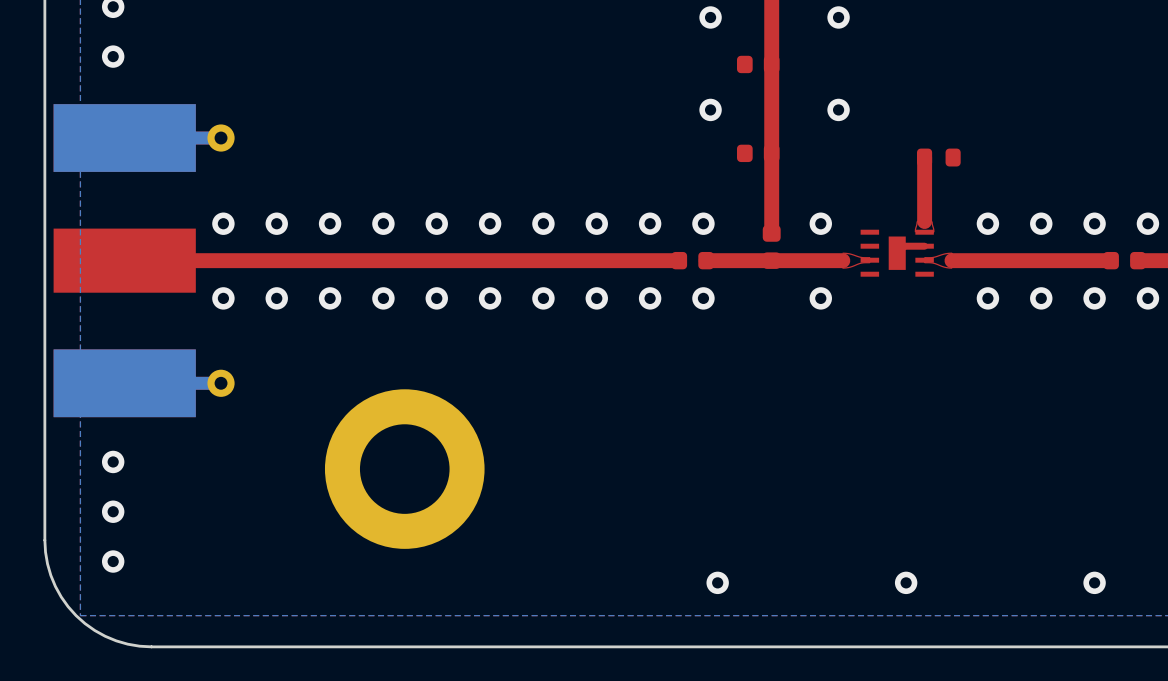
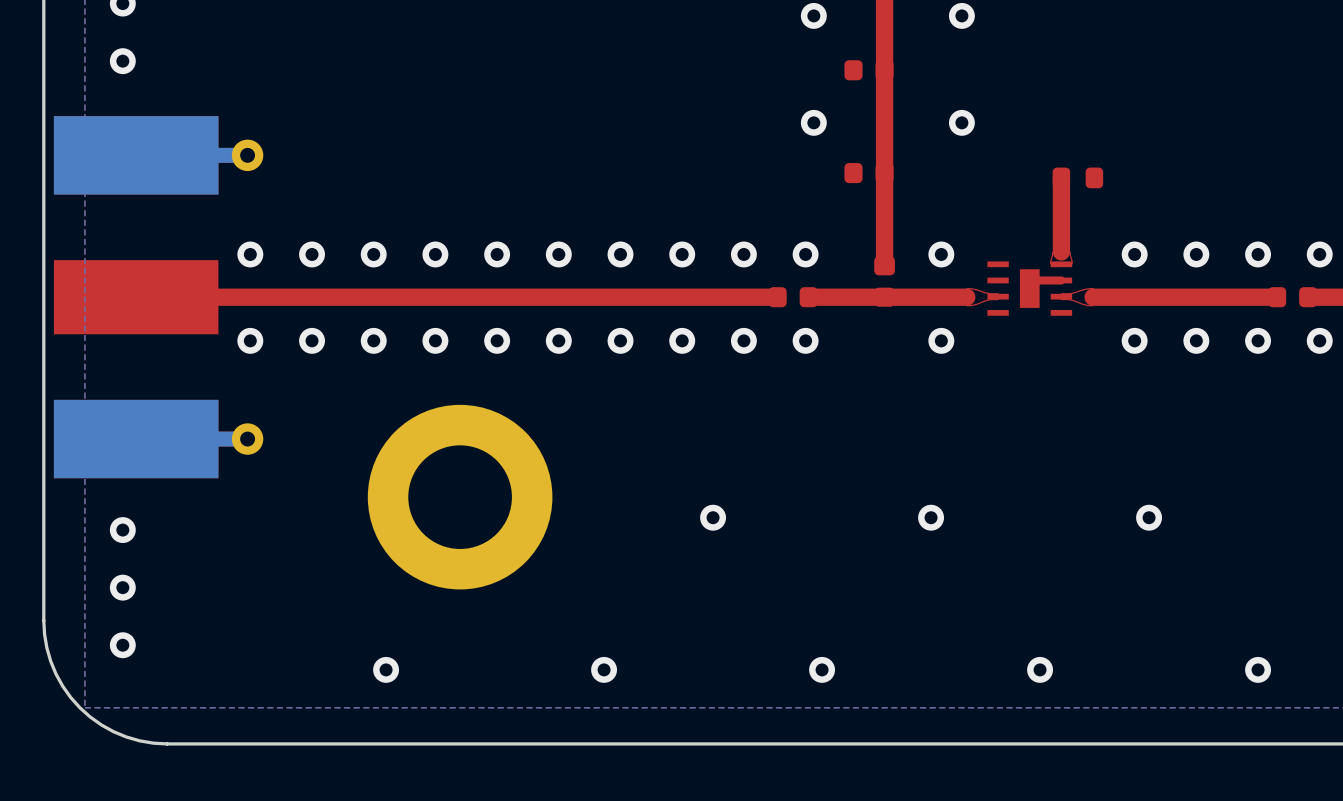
via: none -> (713, 517)
via: none -> (931, 517)
via: none -> (1149, 517)
part position: (404, 469) -> (460, 497)
via: none -> (386, 669)
via: none -> (604, 669)

